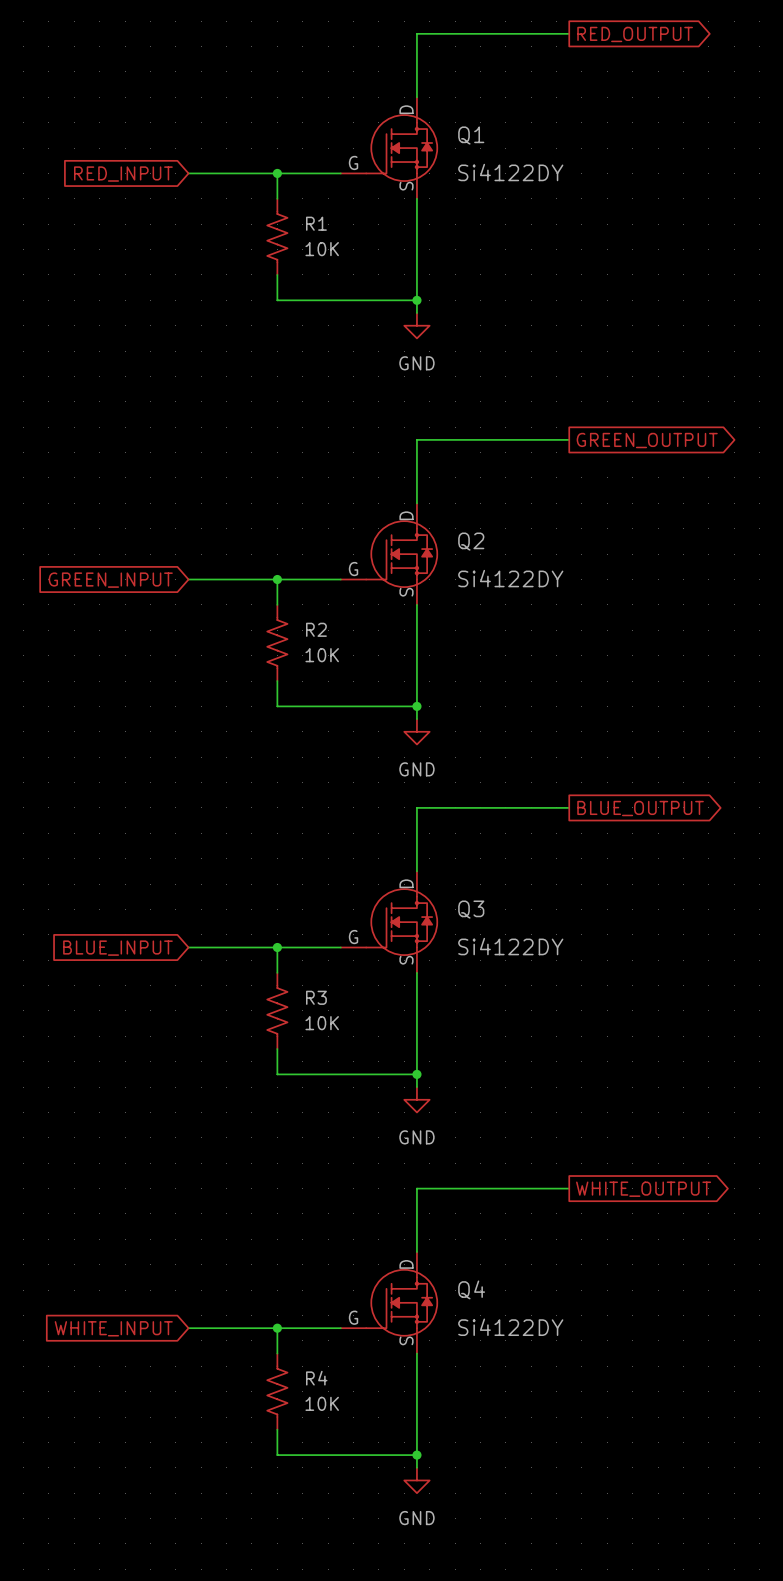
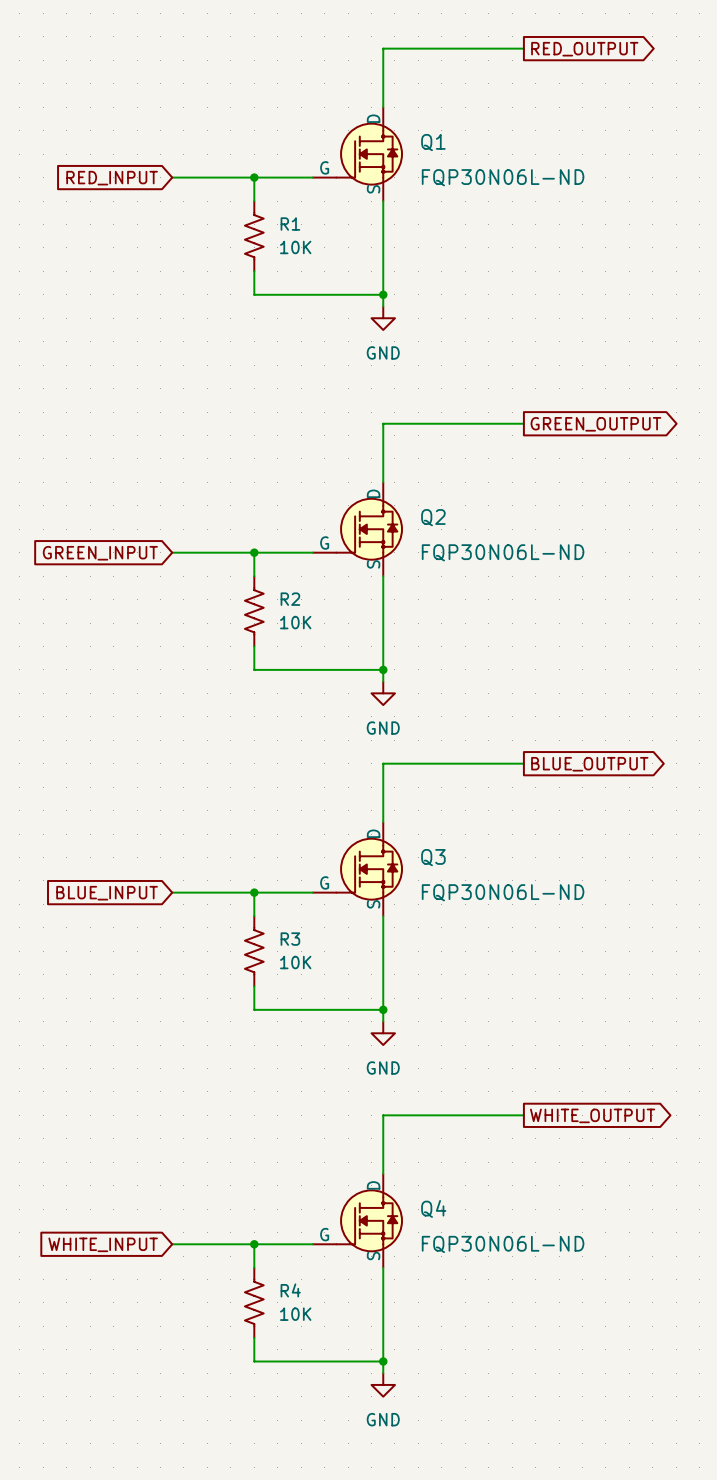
Q1 value: Si4122DY (510, 172) -> FQP30N06L-ND (503, 177)
Q2 value: Si4122DY (510, 578) -> FQP30N06L-ND (503, 552)
Q3 value: Si4122DY (510, 946) -> FQP30N06L-ND (503, 892)
Q4 value: Si4122DY (510, 1327) -> FQP30N06L-ND (503, 1244)

